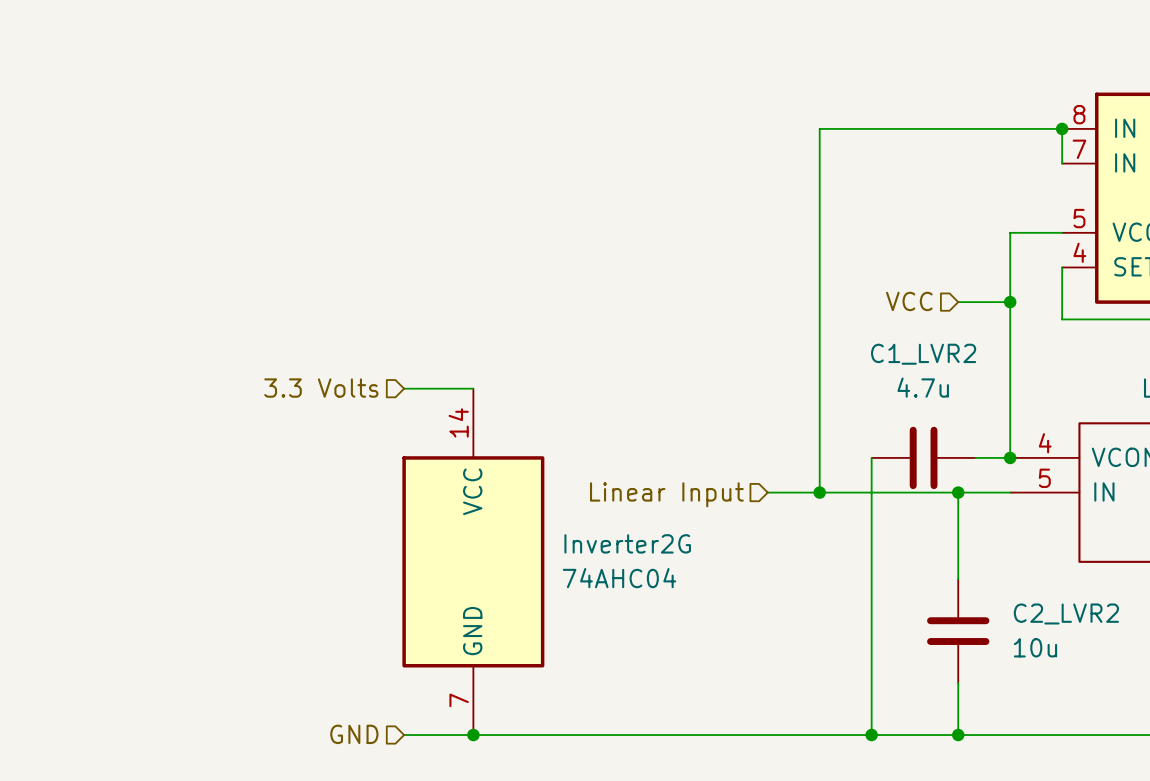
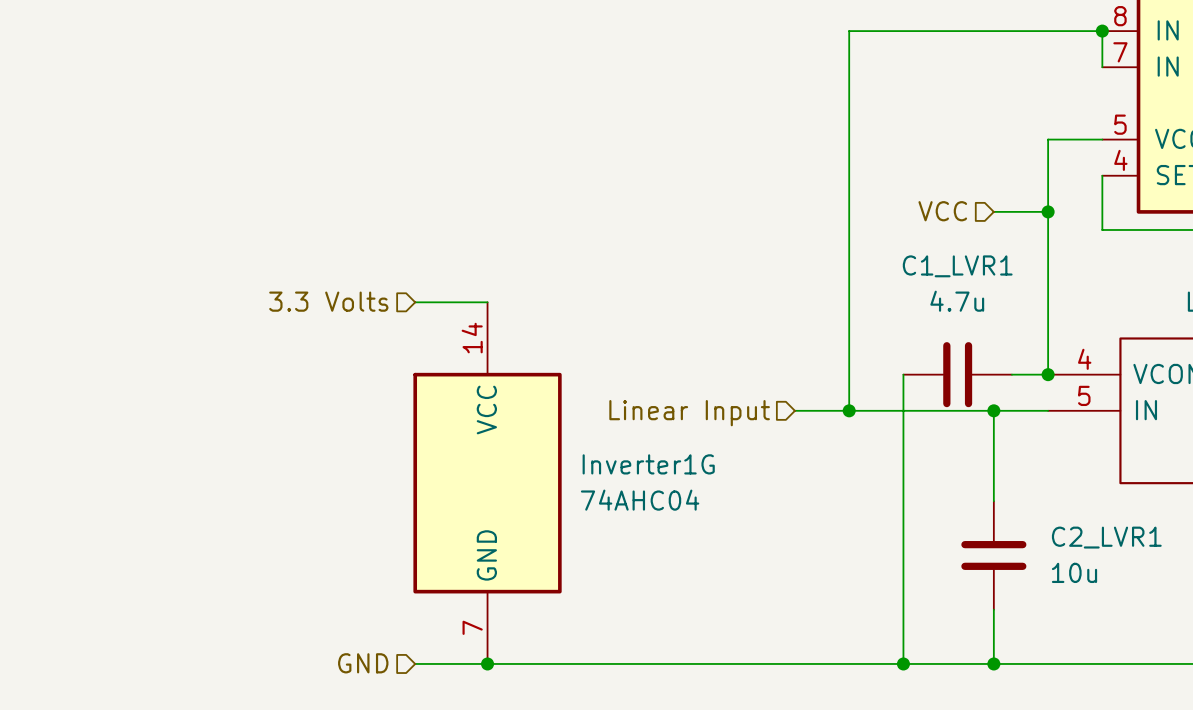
C1_LVR2 name: C1_LVR2 (923, 354) -> C1_LVR1 (957, 266)
Inverter2G name: Inverter2G (627, 543) -> Inverter1G (648, 464)
C2_LVR2 name: C2_LVR2 (1066, 613) -> C2_LVR1 (1106, 537)

